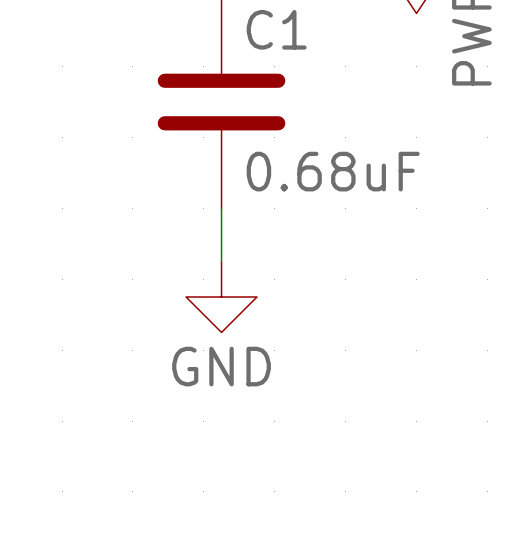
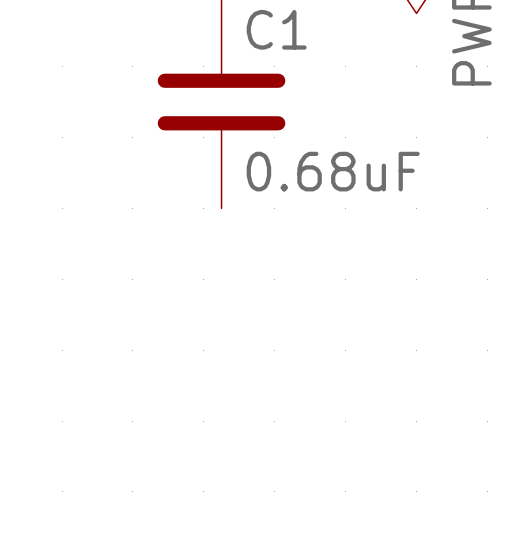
wire: (221, 208) (221, 261) -> none
power symbol: GND (221, 296) -> none

